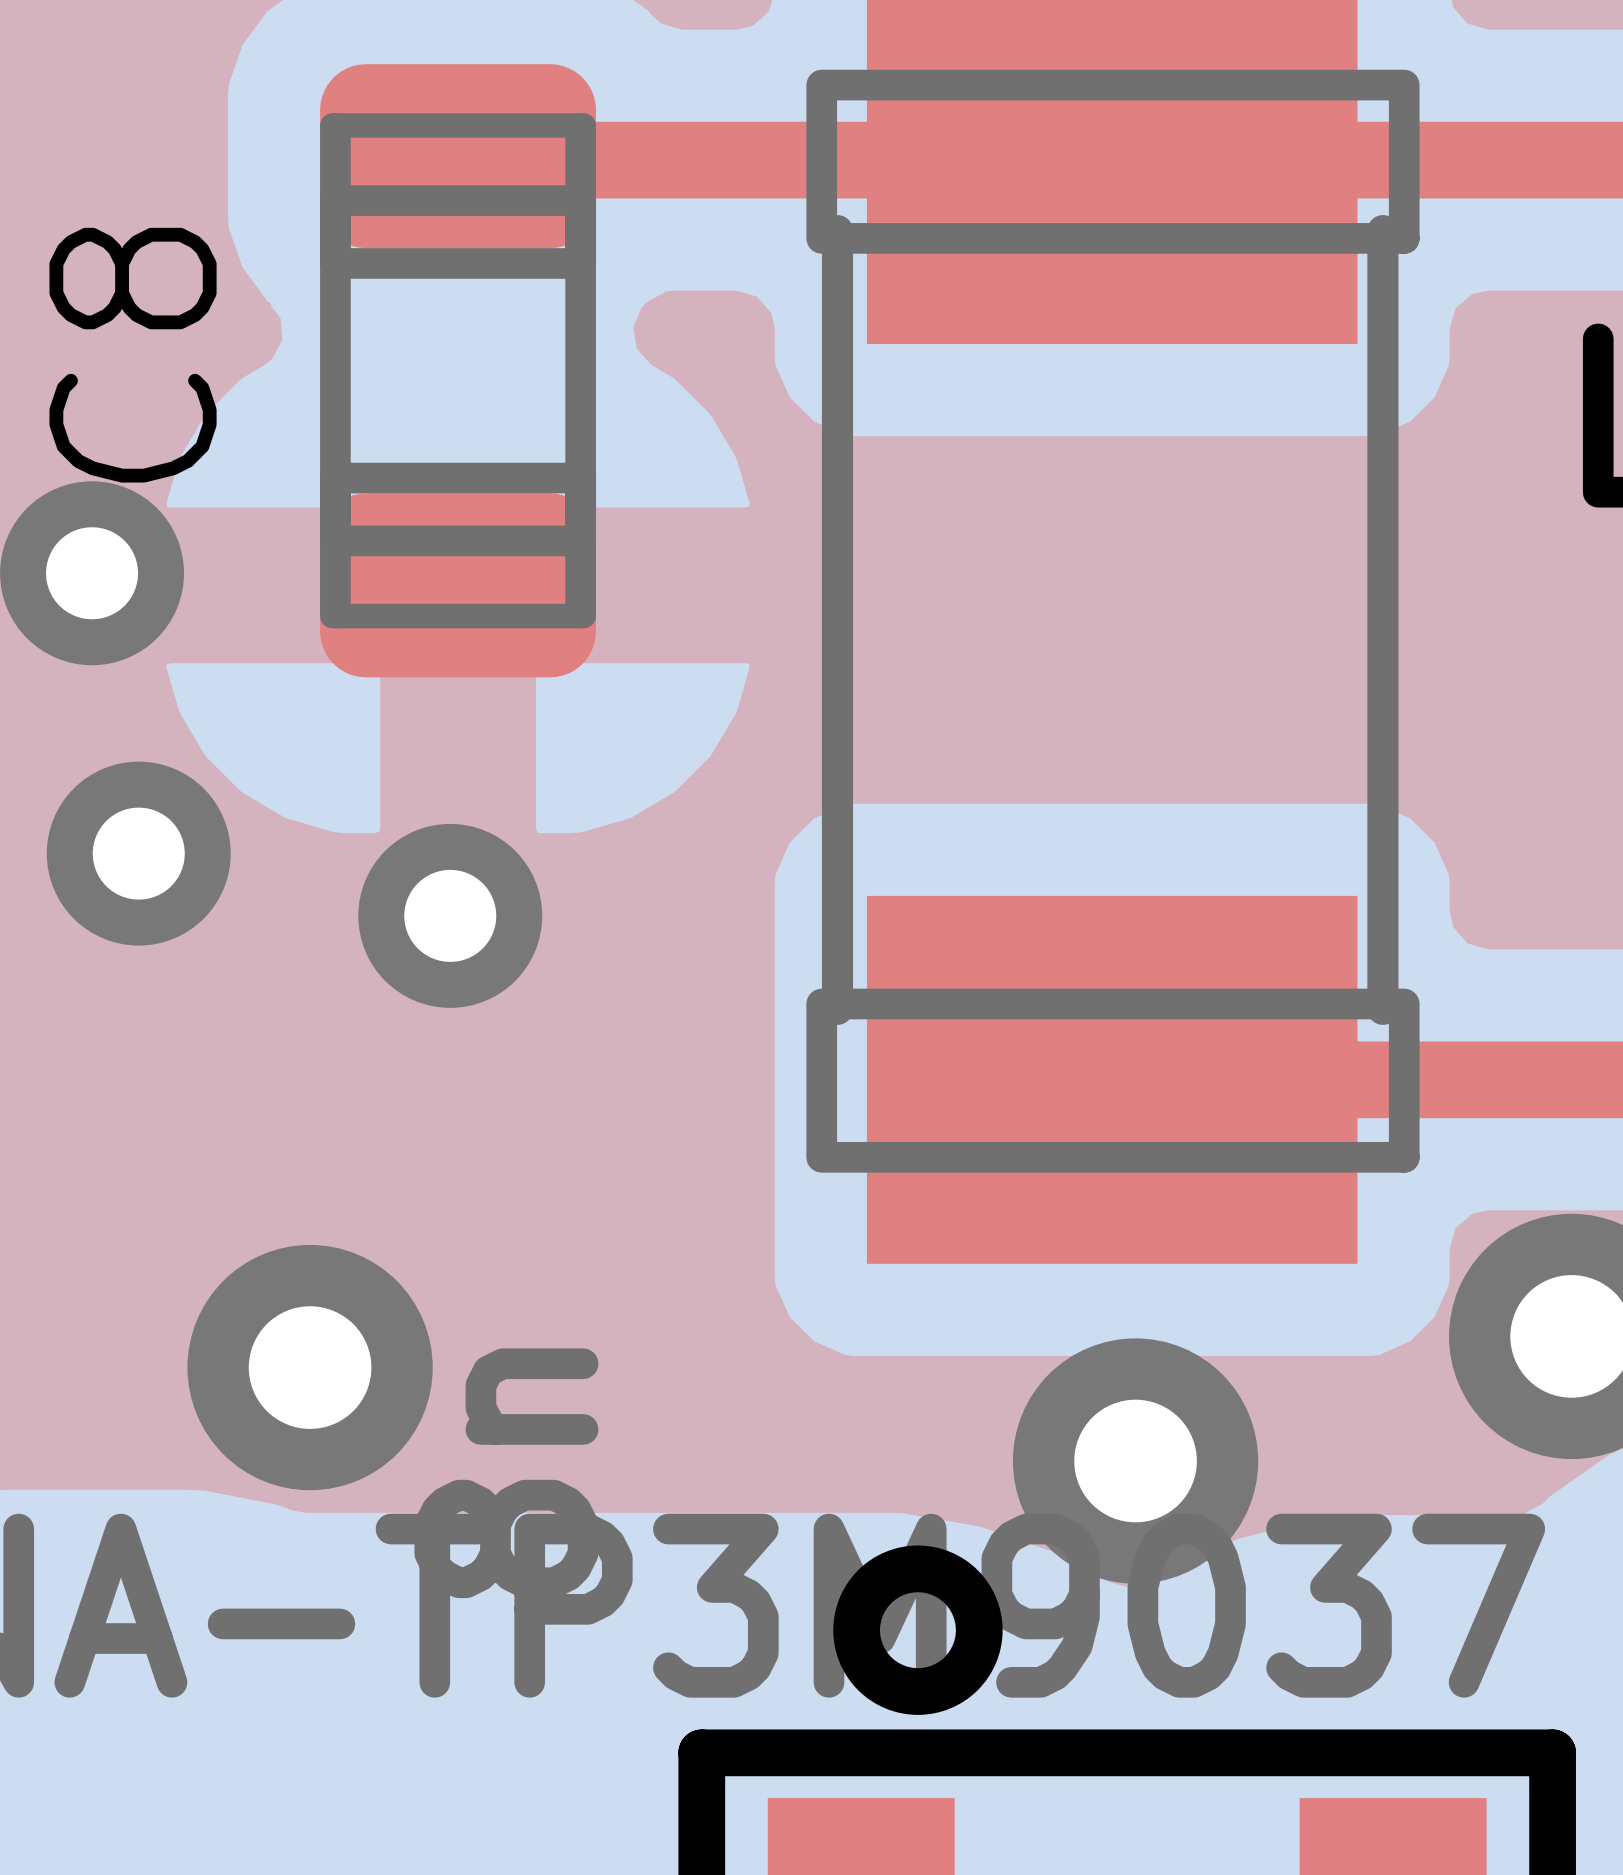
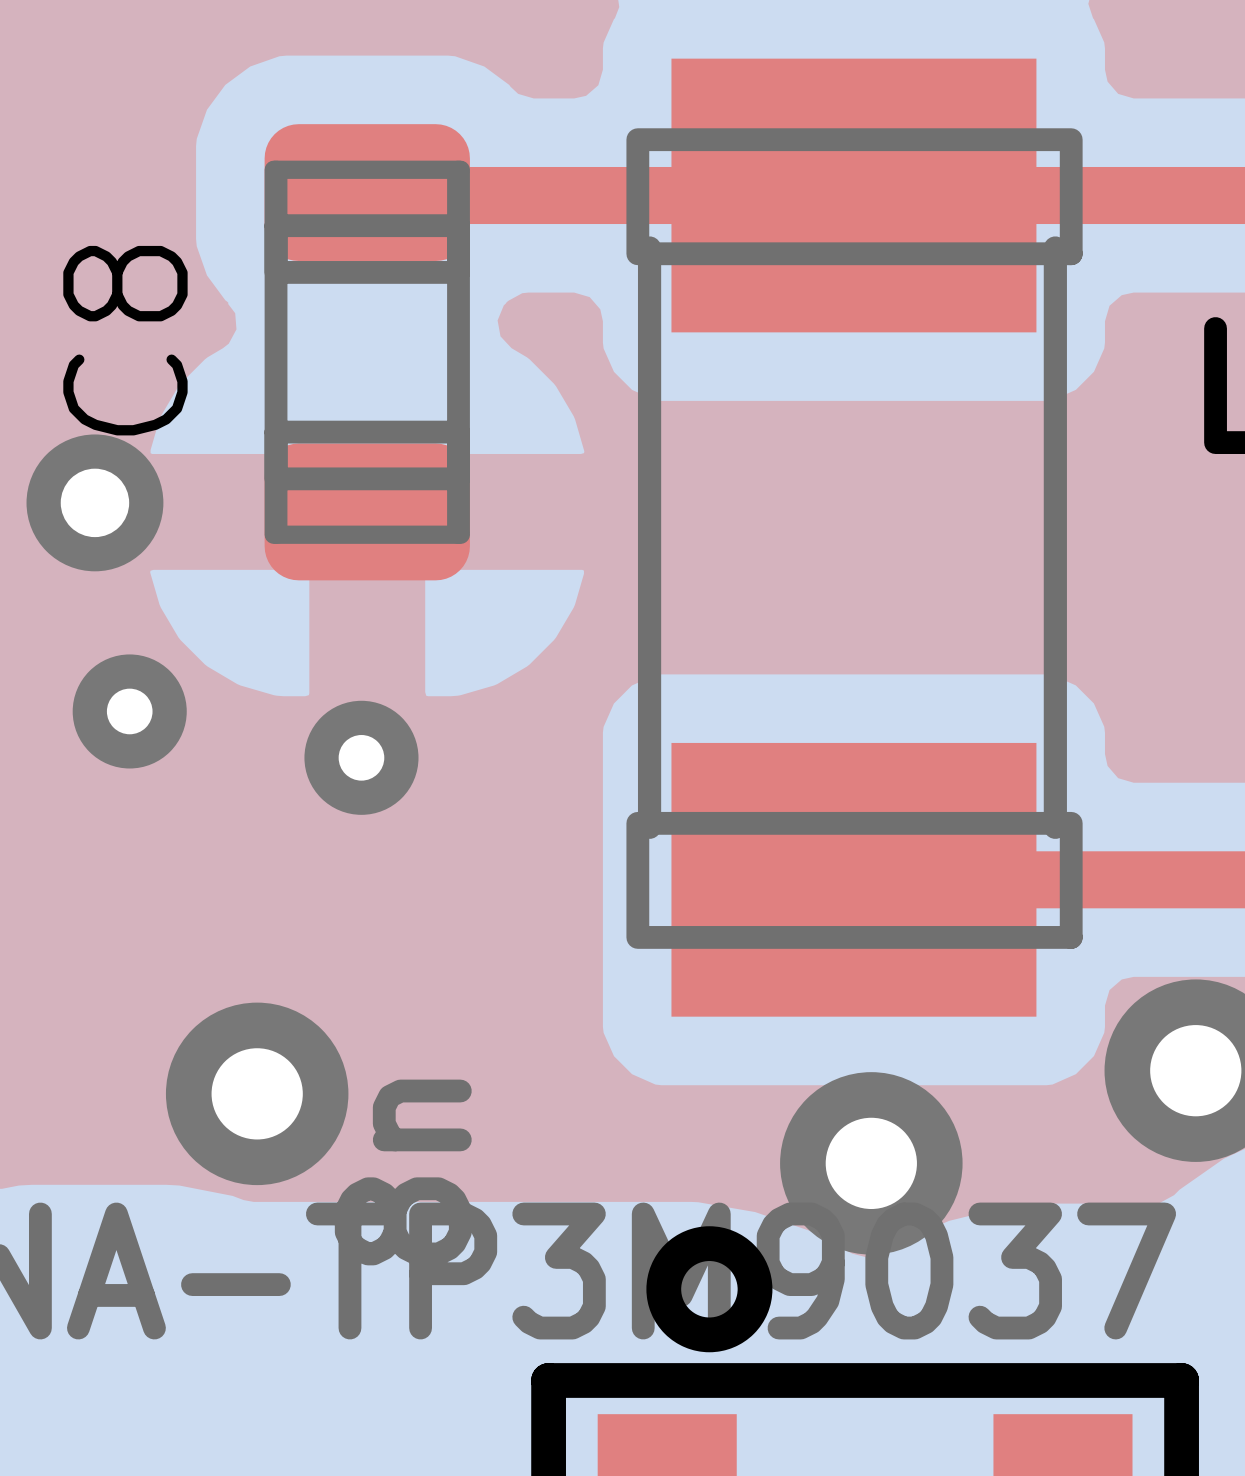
via size: [46, 761, 231, 946] -> [72, 654, 187, 769]
via size: [358, 823, 543, 1008] -> [304, 700, 419, 815]

